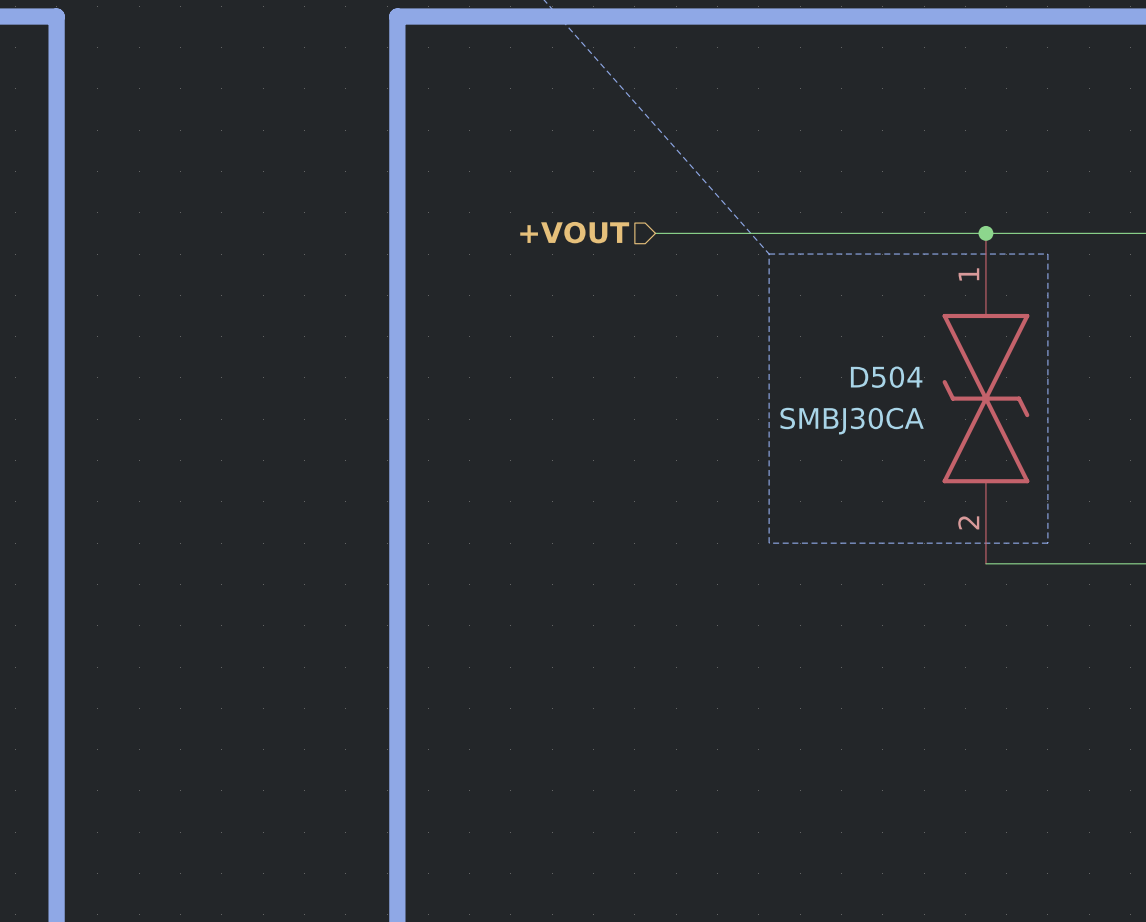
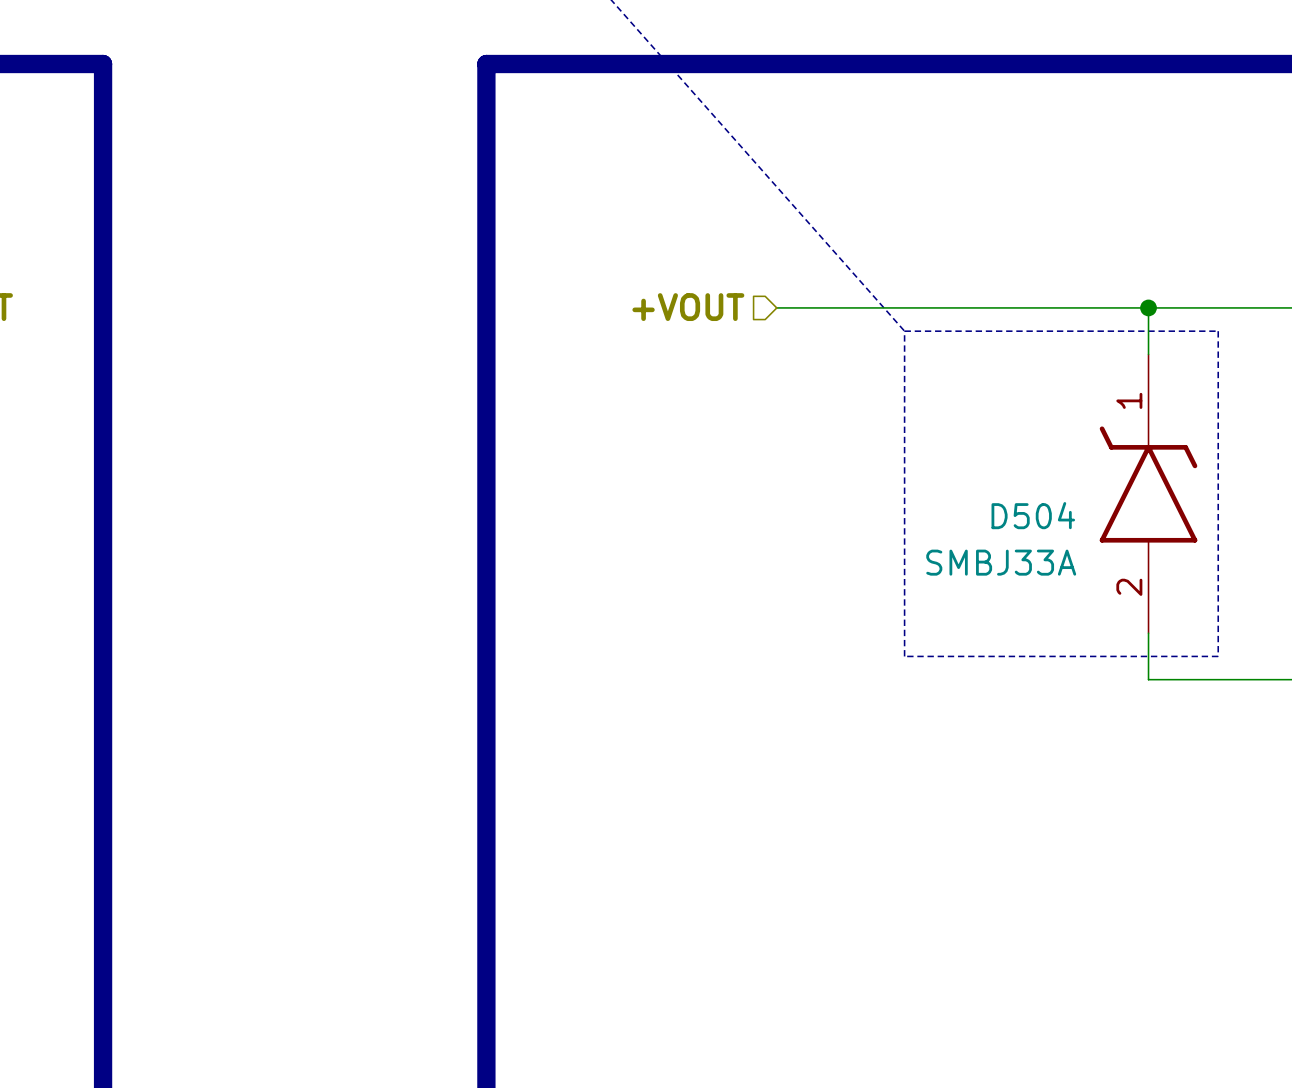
D504 symbol: [942, 233, 1030, 564] -> [1099, 354, 1198, 634]
D504 name position: D504 (886, 377) -> D504 (1033, 515)
D504 value: SMBJ30CA (852, 421) -> SMBJ33A (1001, 562)

